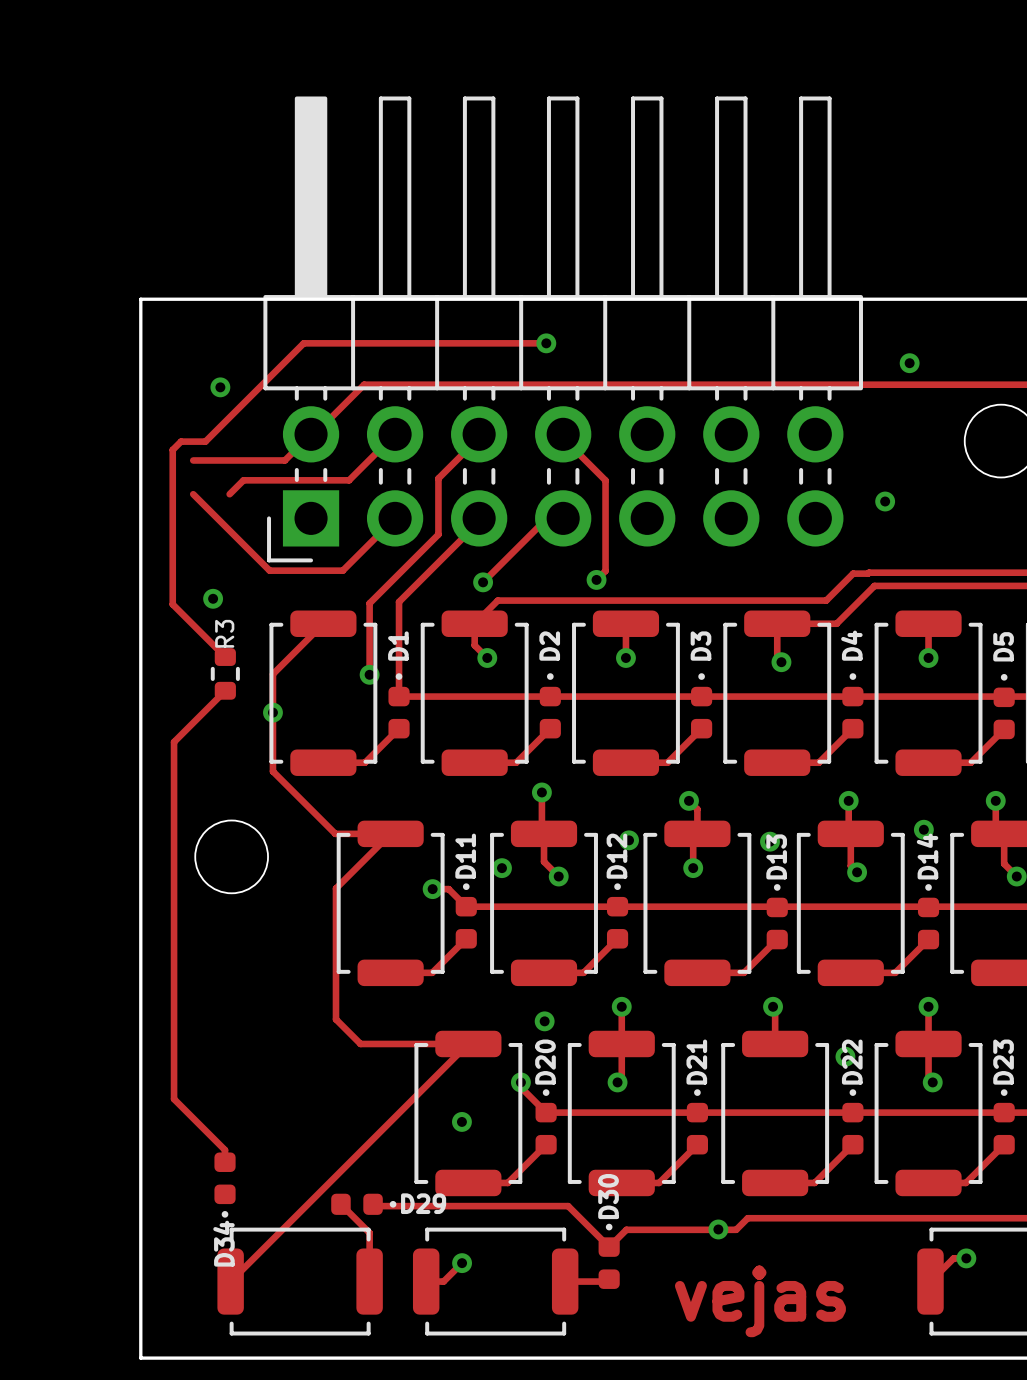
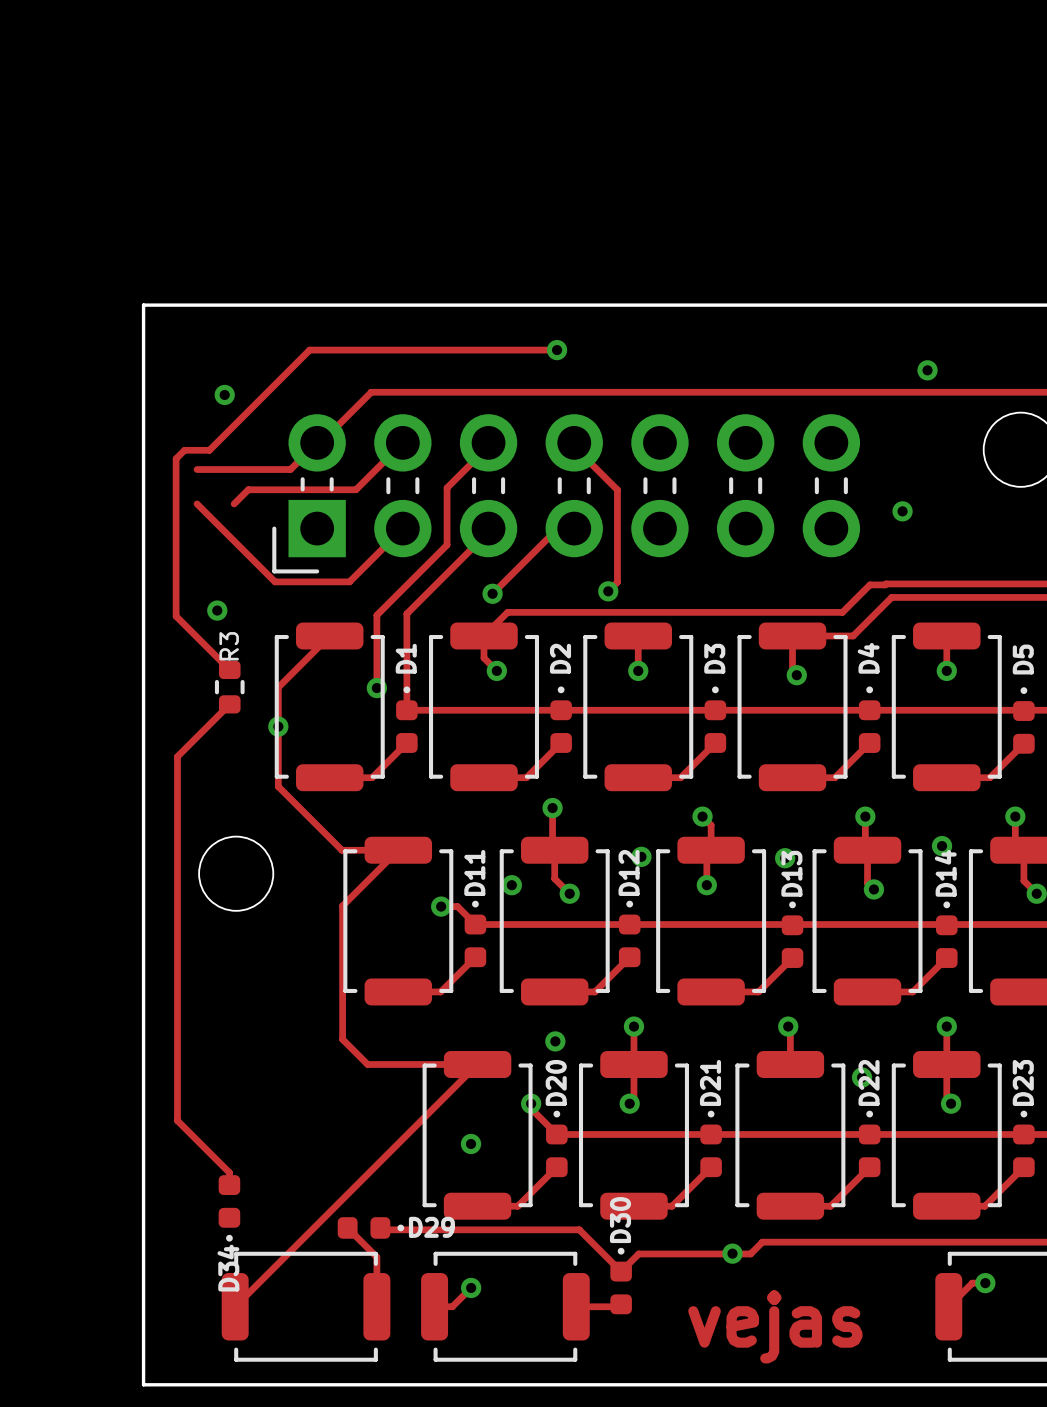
part: (563, 329) -> none

